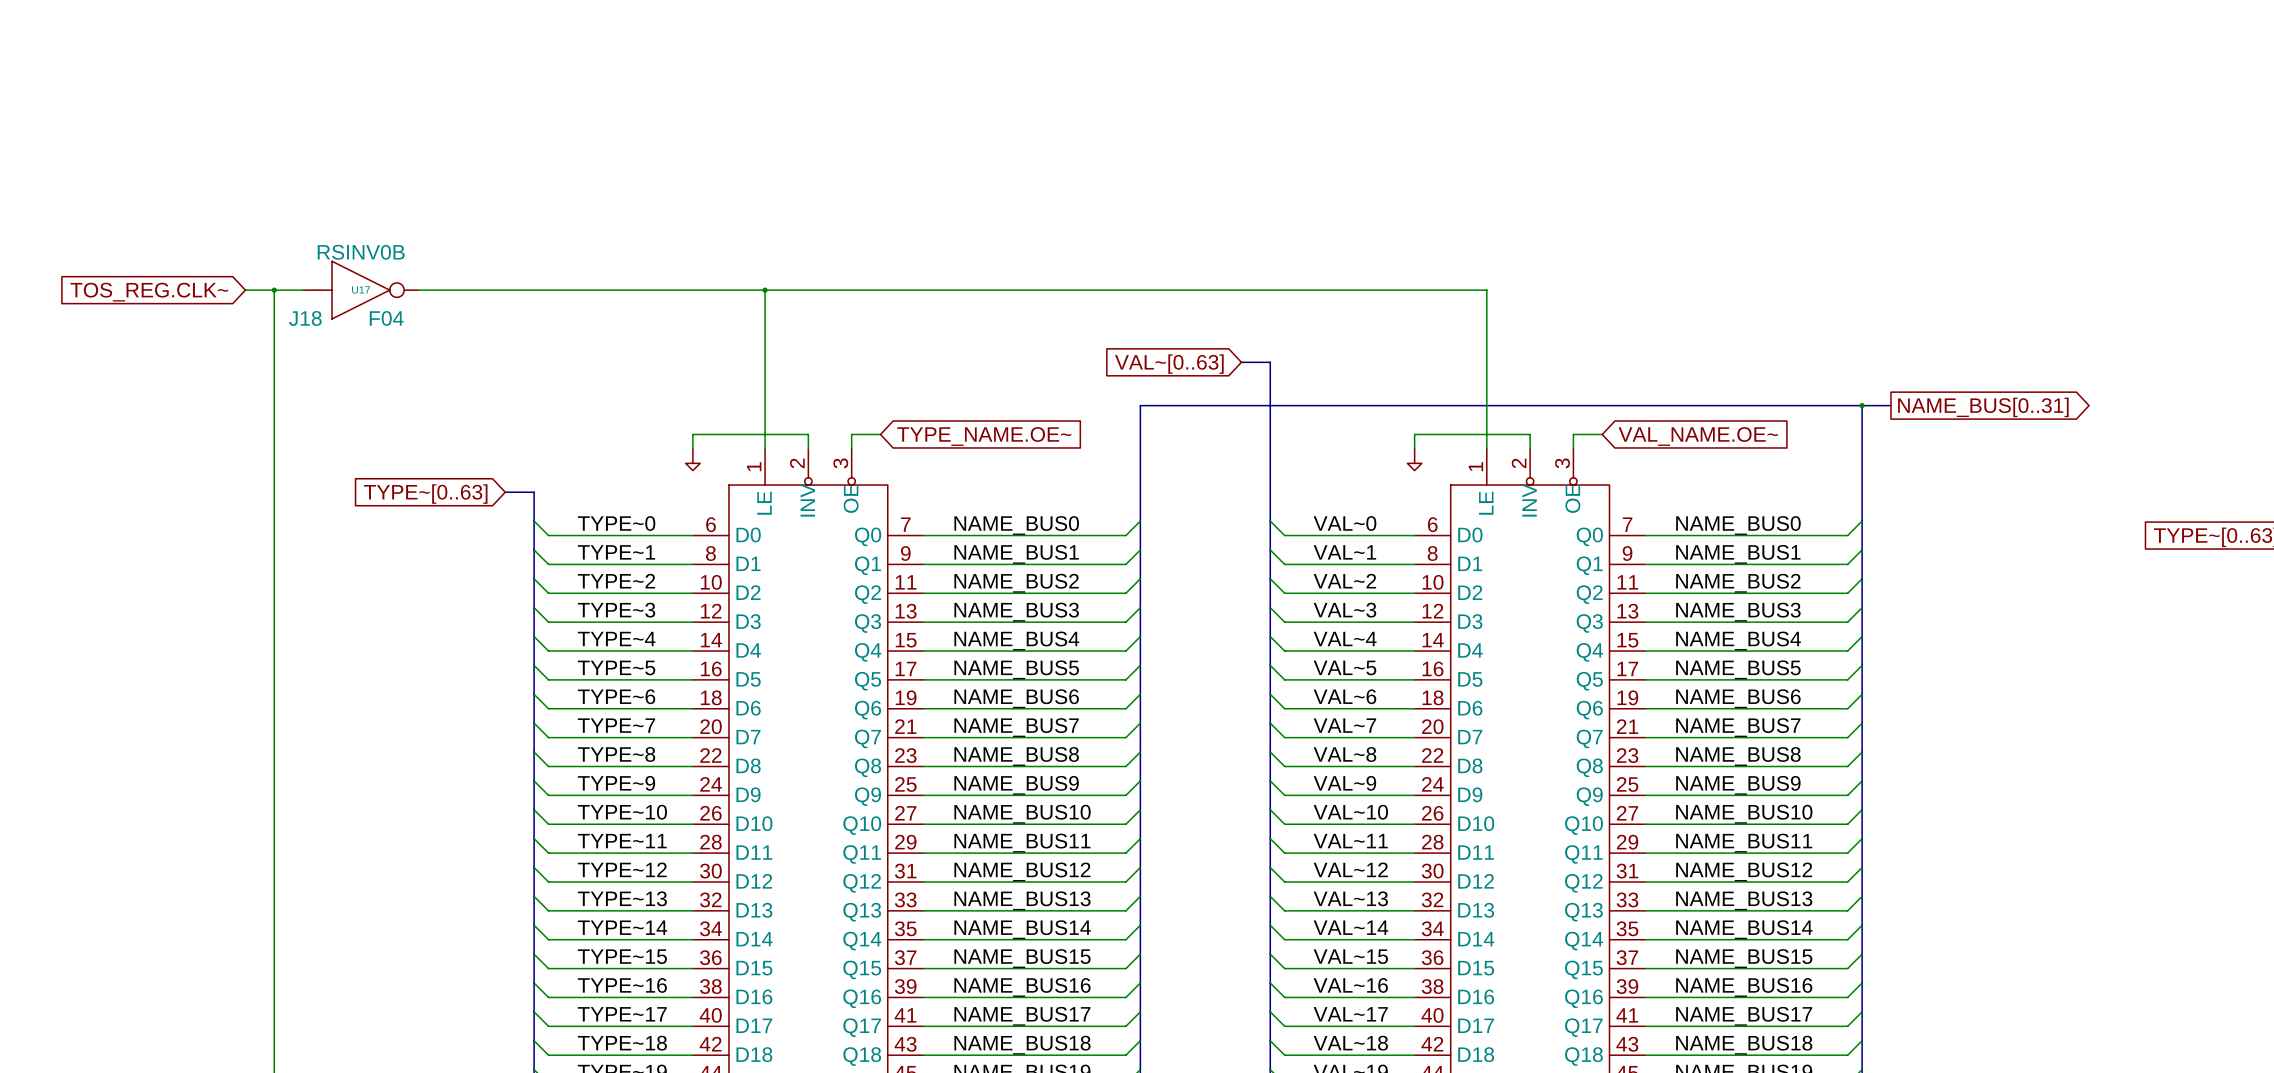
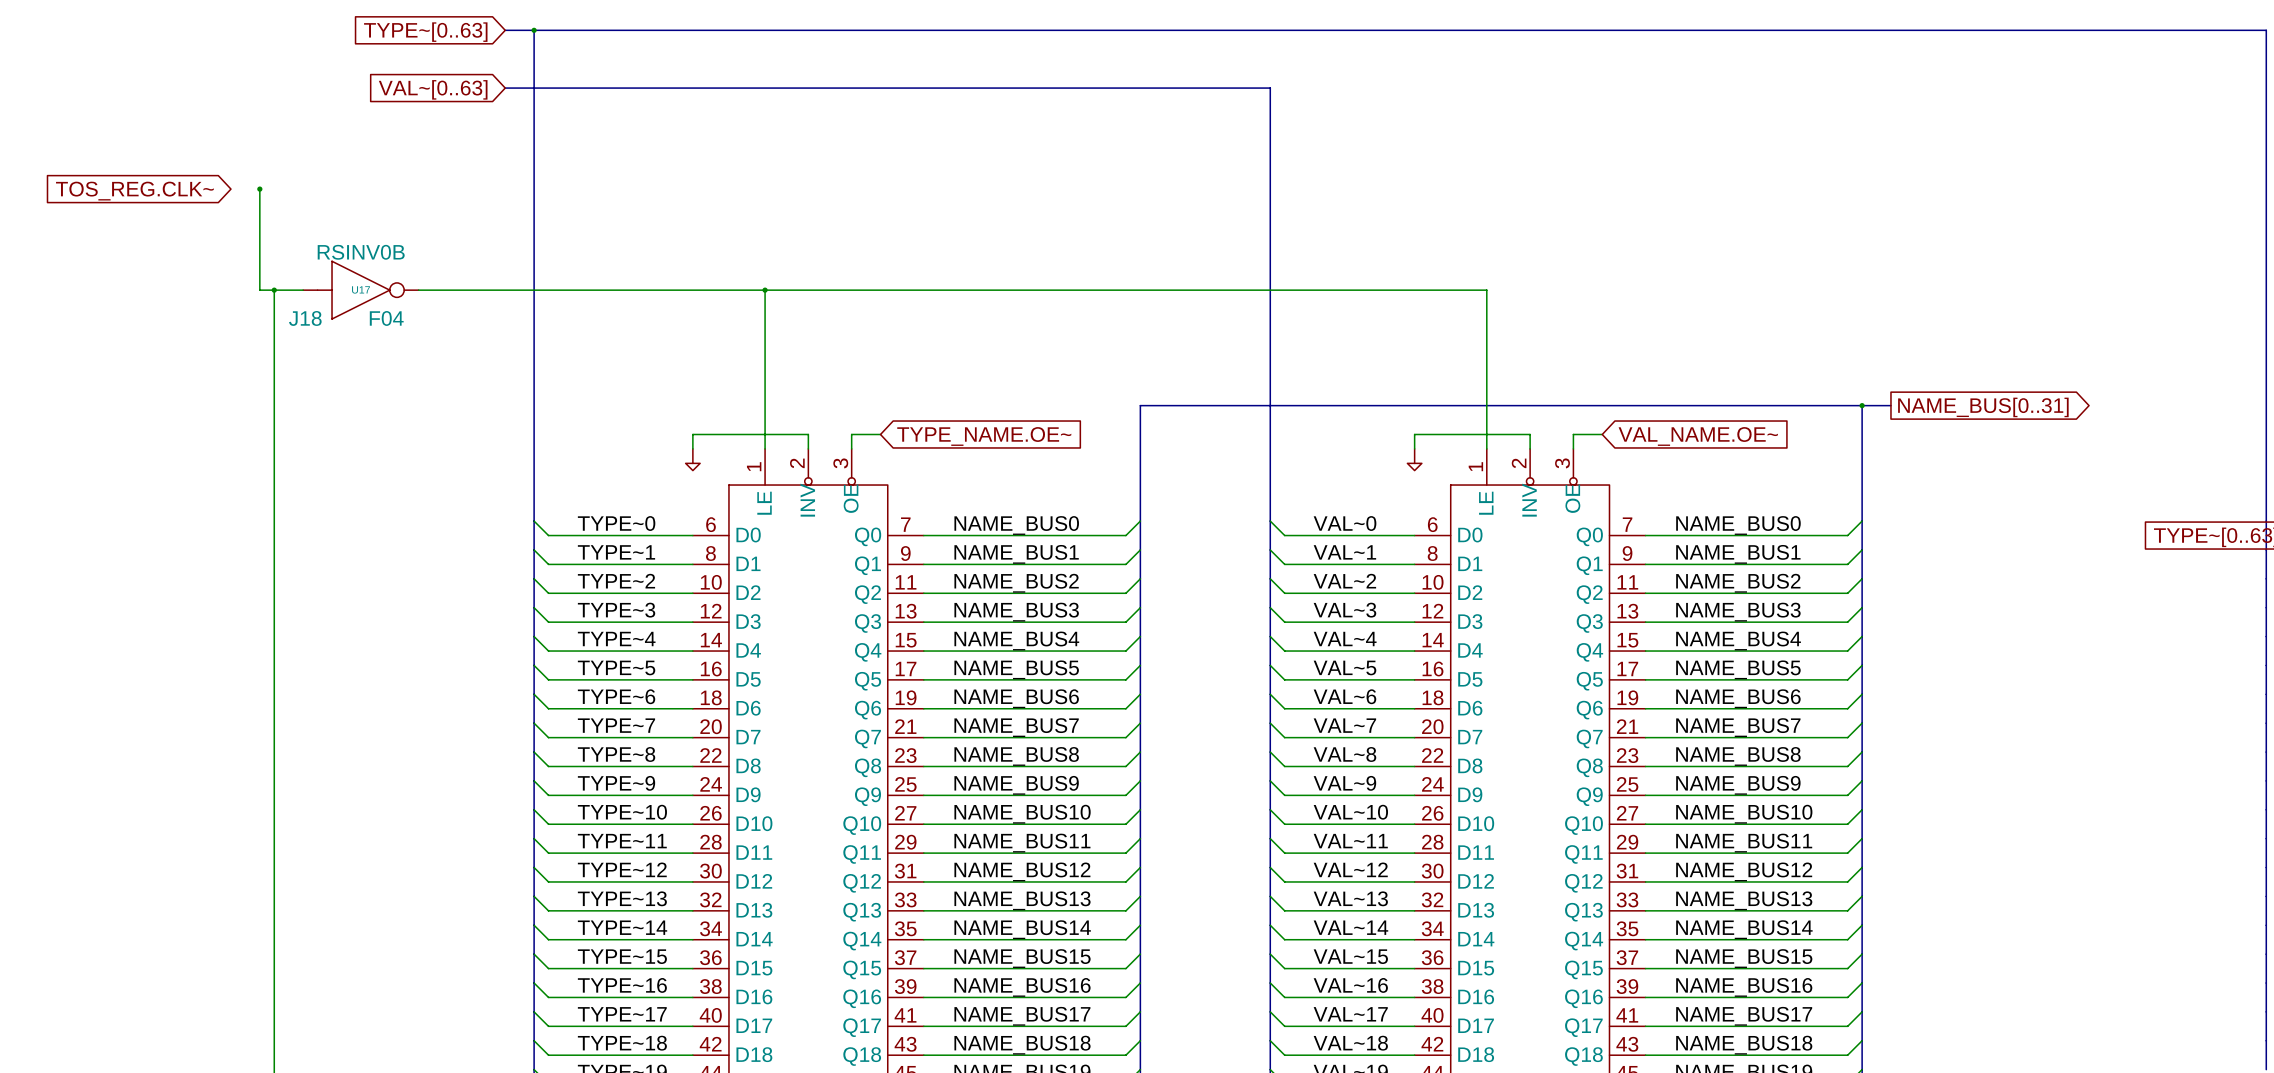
bus: none -> (505, 30) (2266, 30) (2266, 1069)
junction: none -> (534, 30)
global label: none -> TYPE~[0..63] (425, 32)
global label: none -> VAL~[0..63] (433, 89)
junction: none -> (259, 189)
wire: (245, 290) (259, 290) -> (259, 189) (259, 290)
global label position: TOS_REG.CLK~ (149, 292) -> TOS_REG.CLK~ (134, 191)
bus: (1241, 362) (1270, 362) -> (505, 88) (1270, 88) (1270, 362)
global label: VAL~[0..63] (1169, 364) -> none
bus: (505, 492) (534, 492) -> (534, 30) (534, 492)
global label: TYPE~[0..63] (425, 494) -> none

